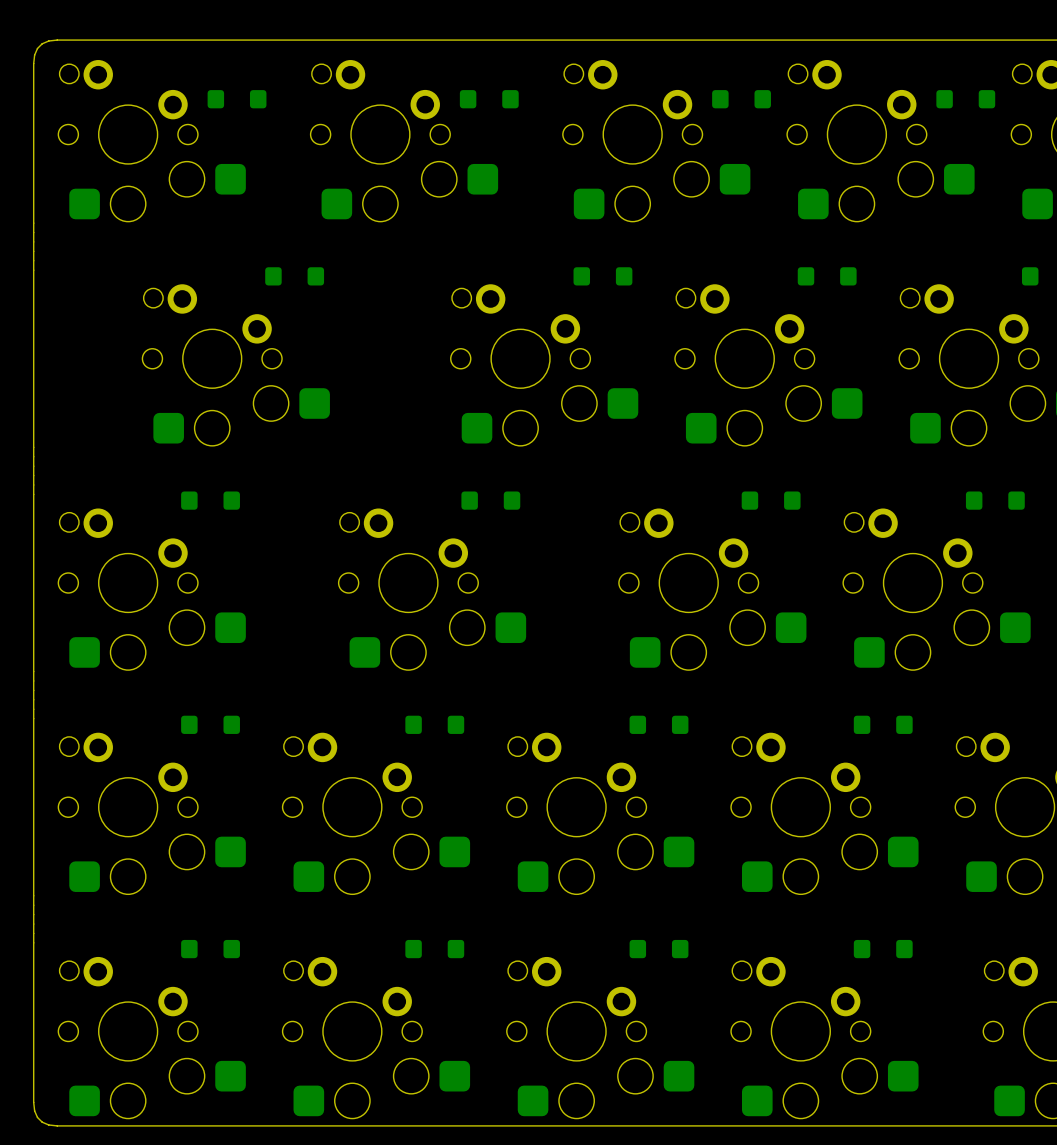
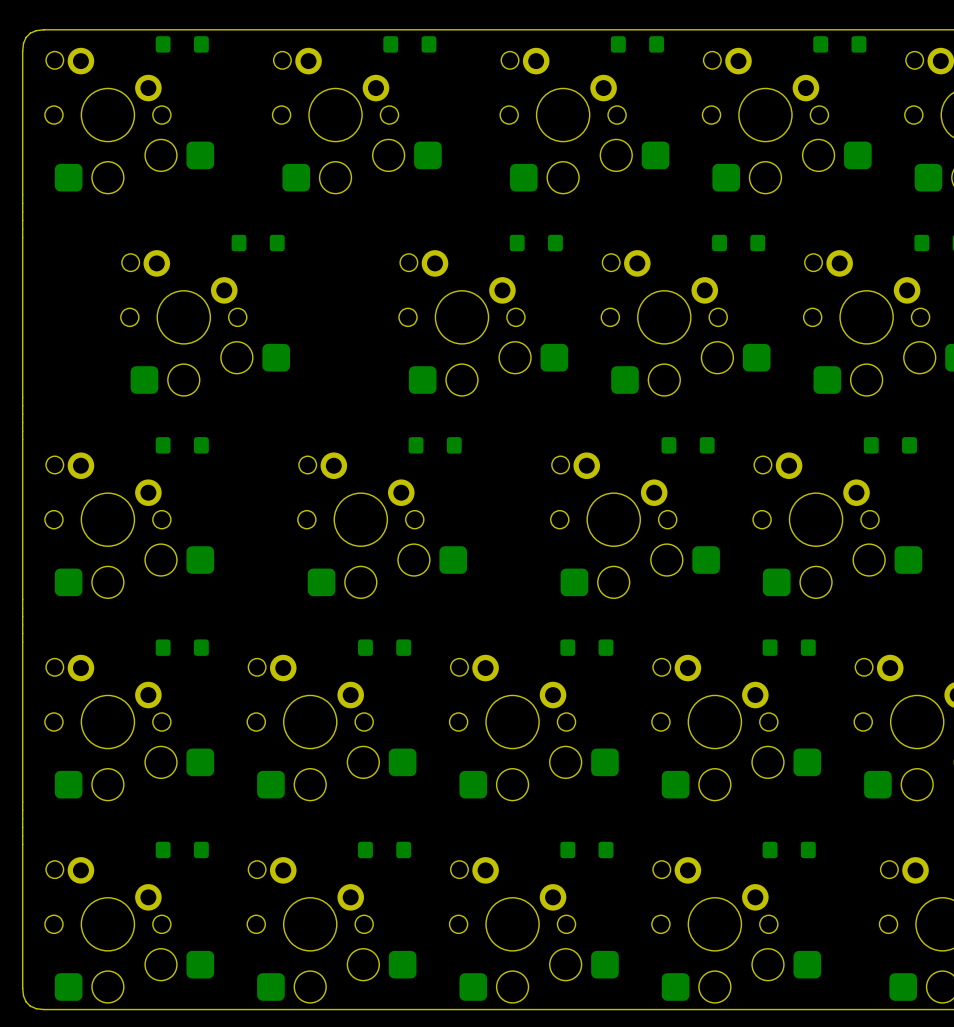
part position: (237, 99) -> (182, 44)
part position: (489, 99) -> (409, 44)
part position: (741, 99) -> (637, 44)
part position: (965, 99) -> (839, 44)

